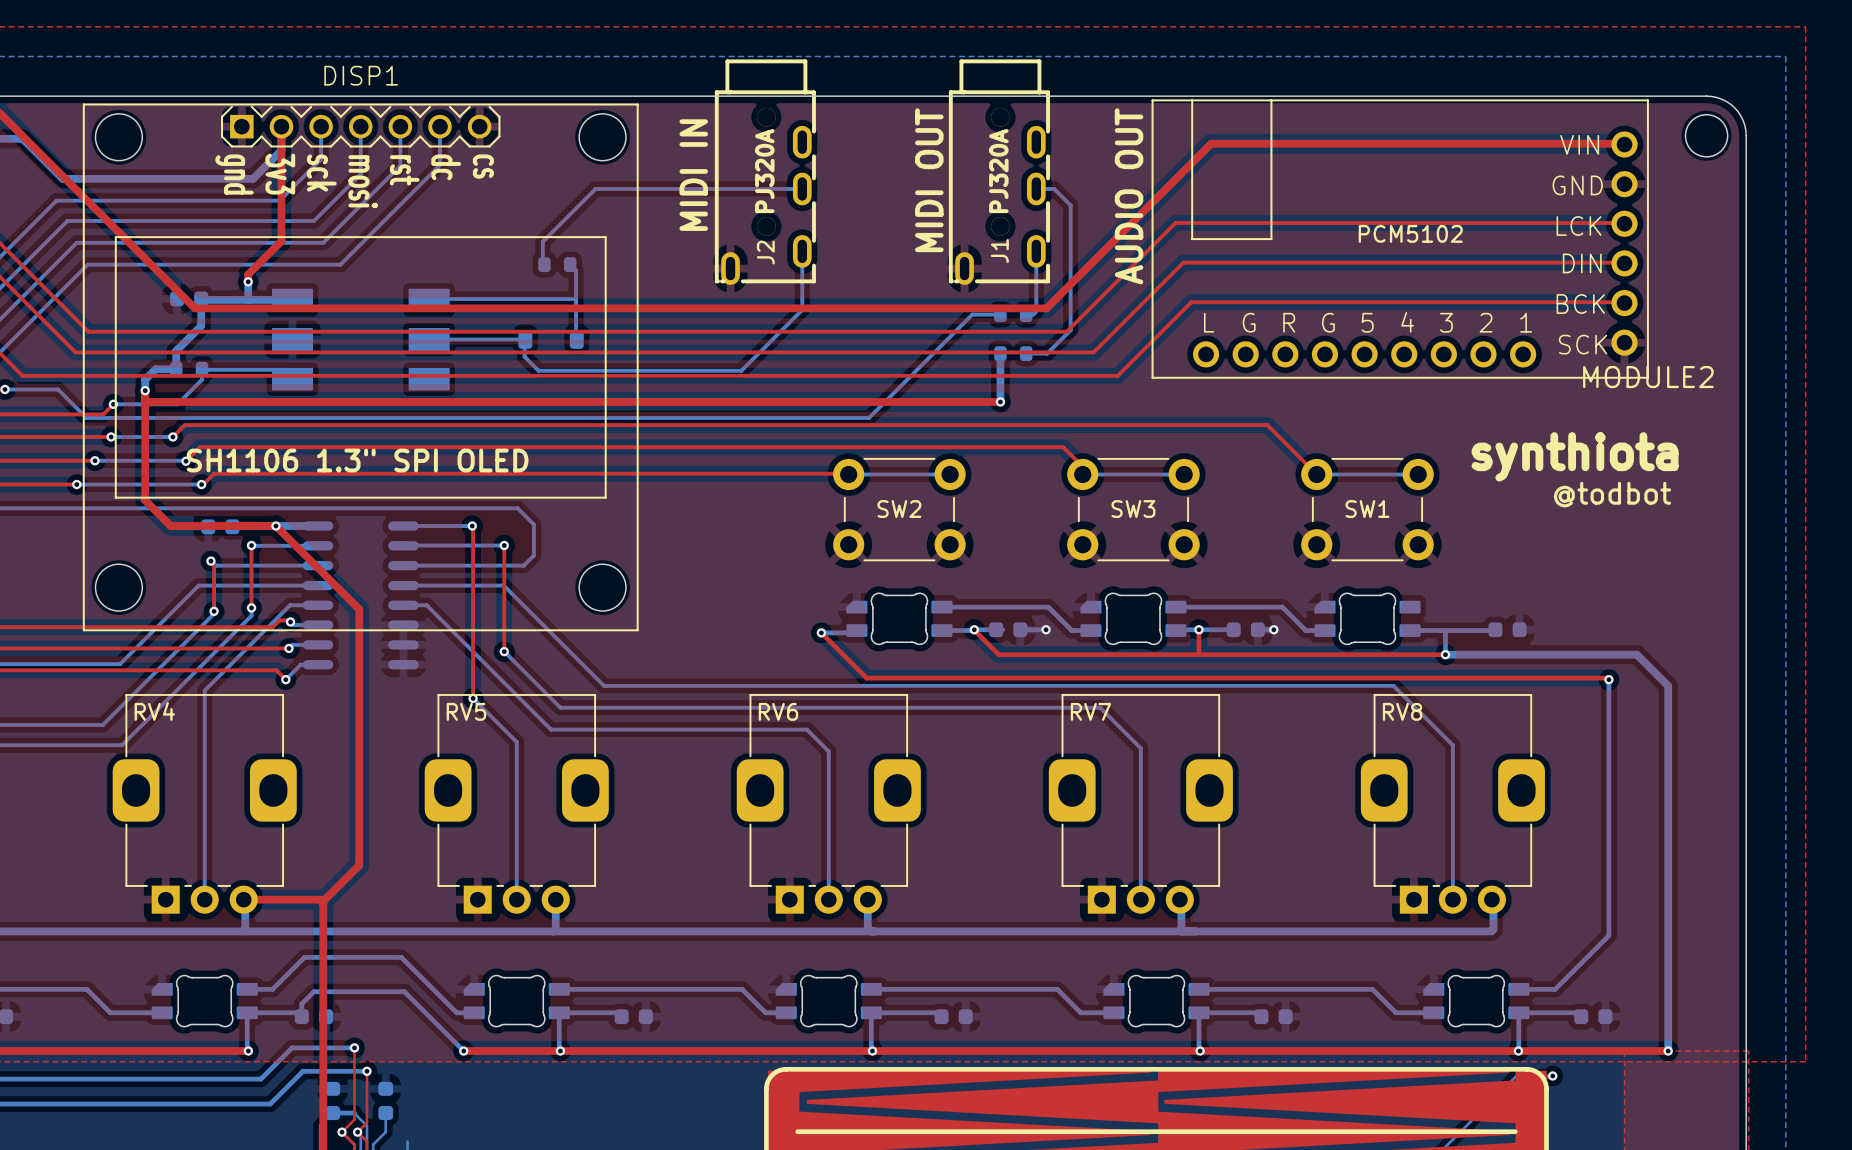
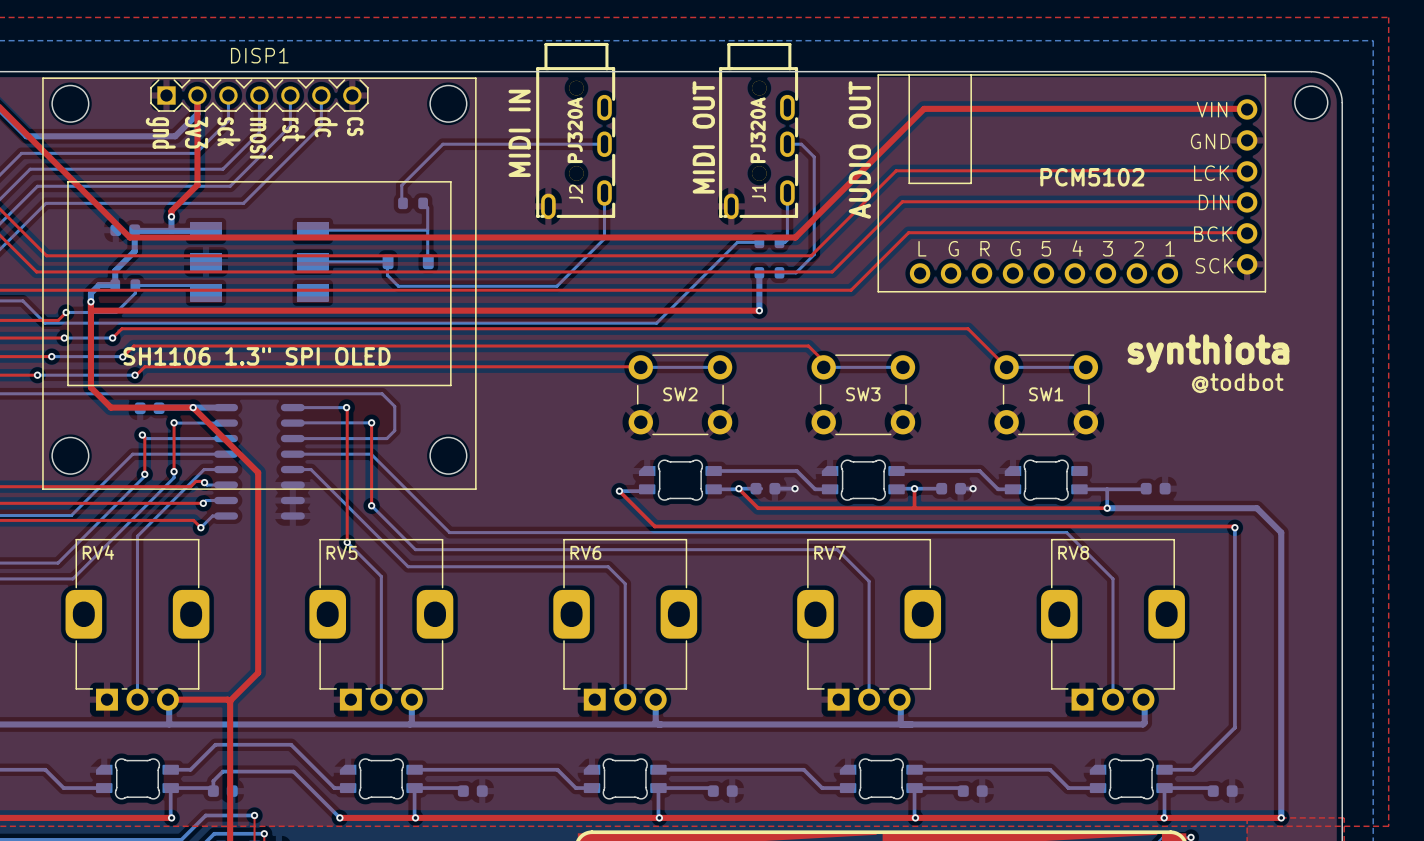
MODULE2 footprint: [1151, 99, 1649, 379] -> [877, 74, 1267, 293]
MODULE2 name: MODULE2 (1648, 377) -> none

